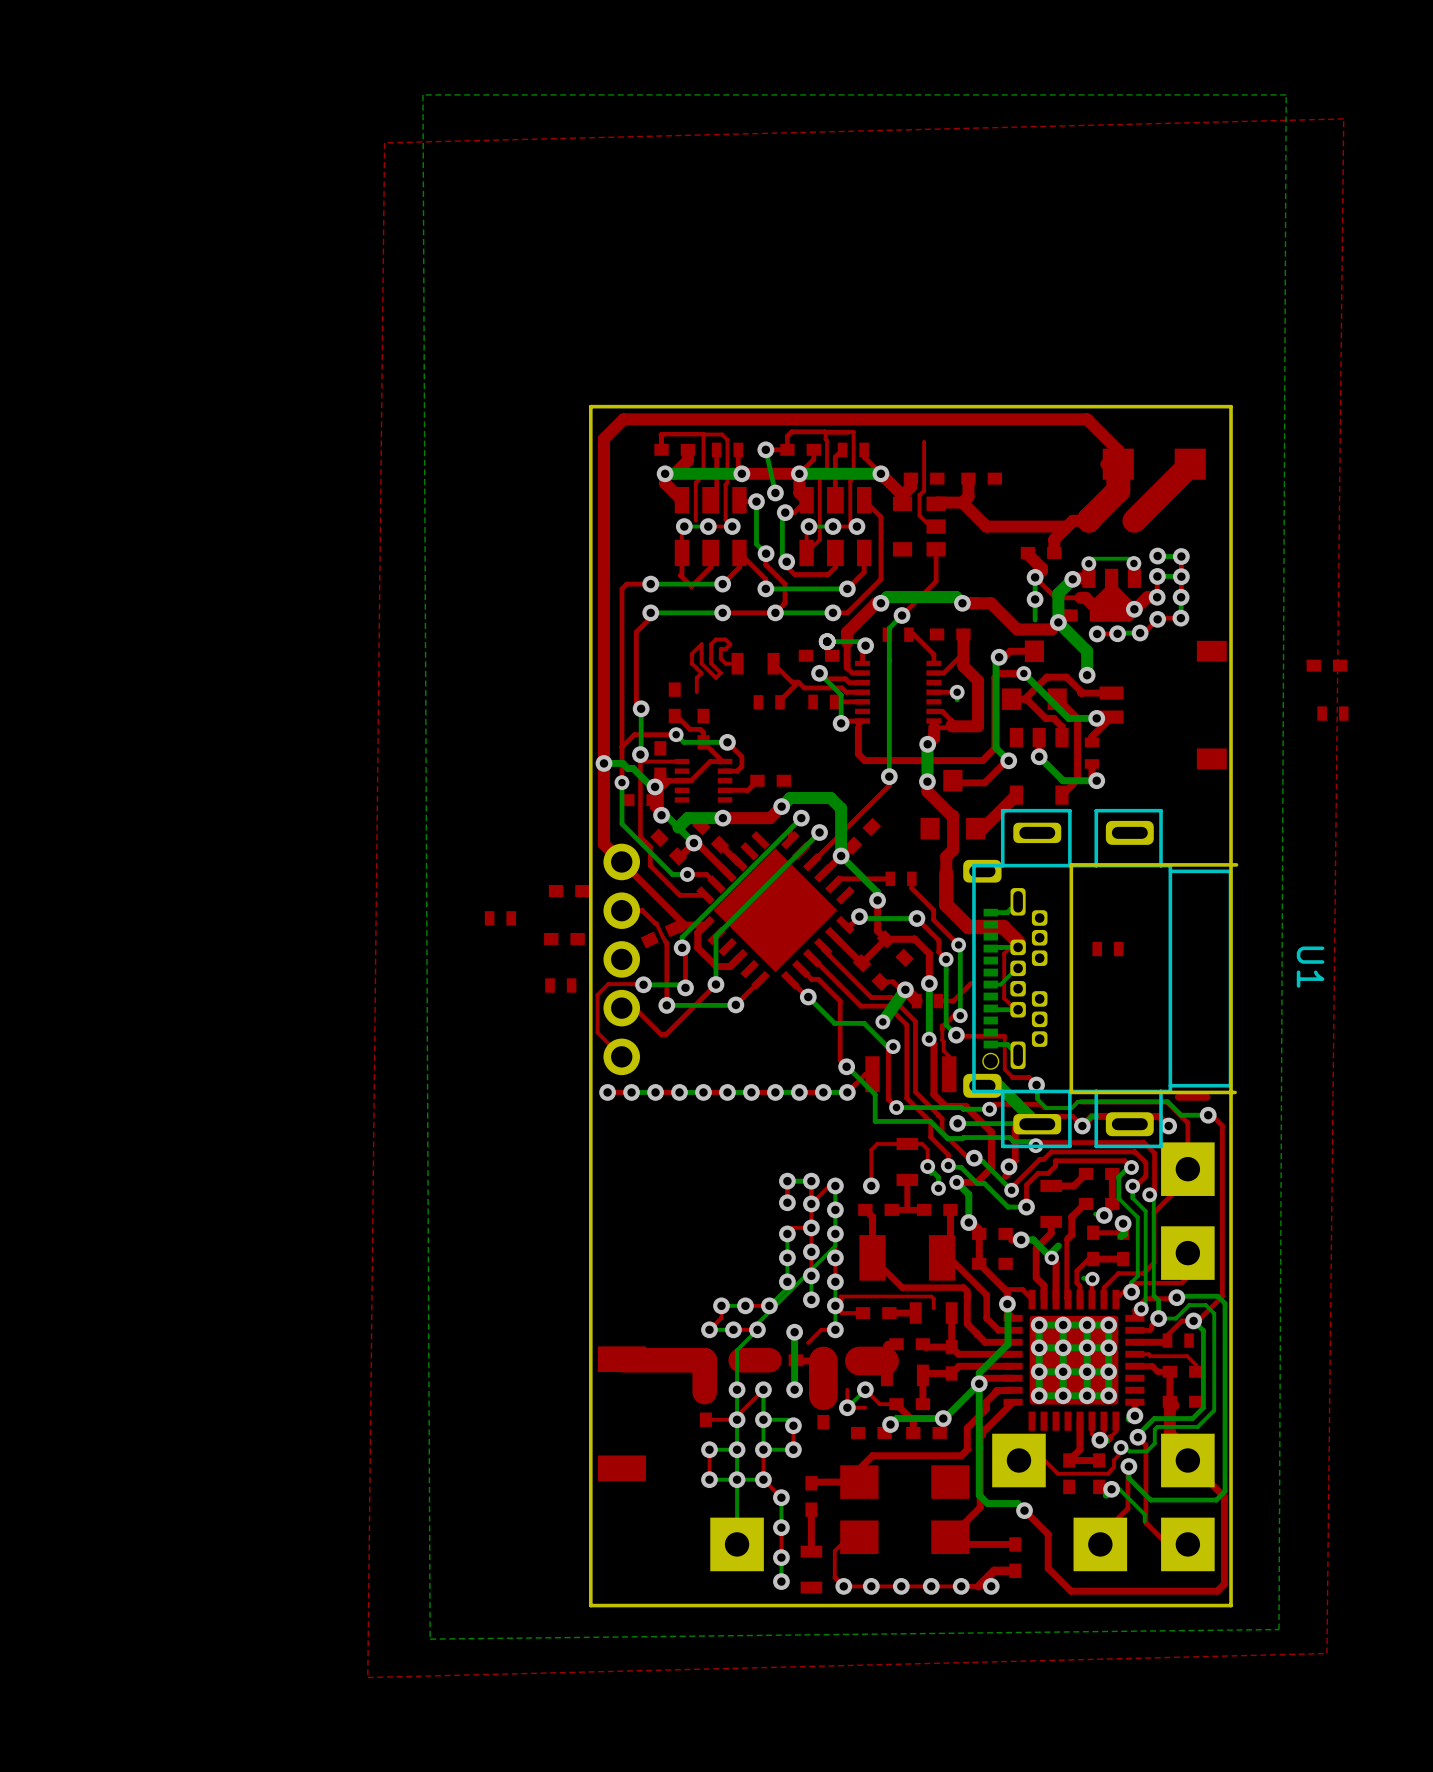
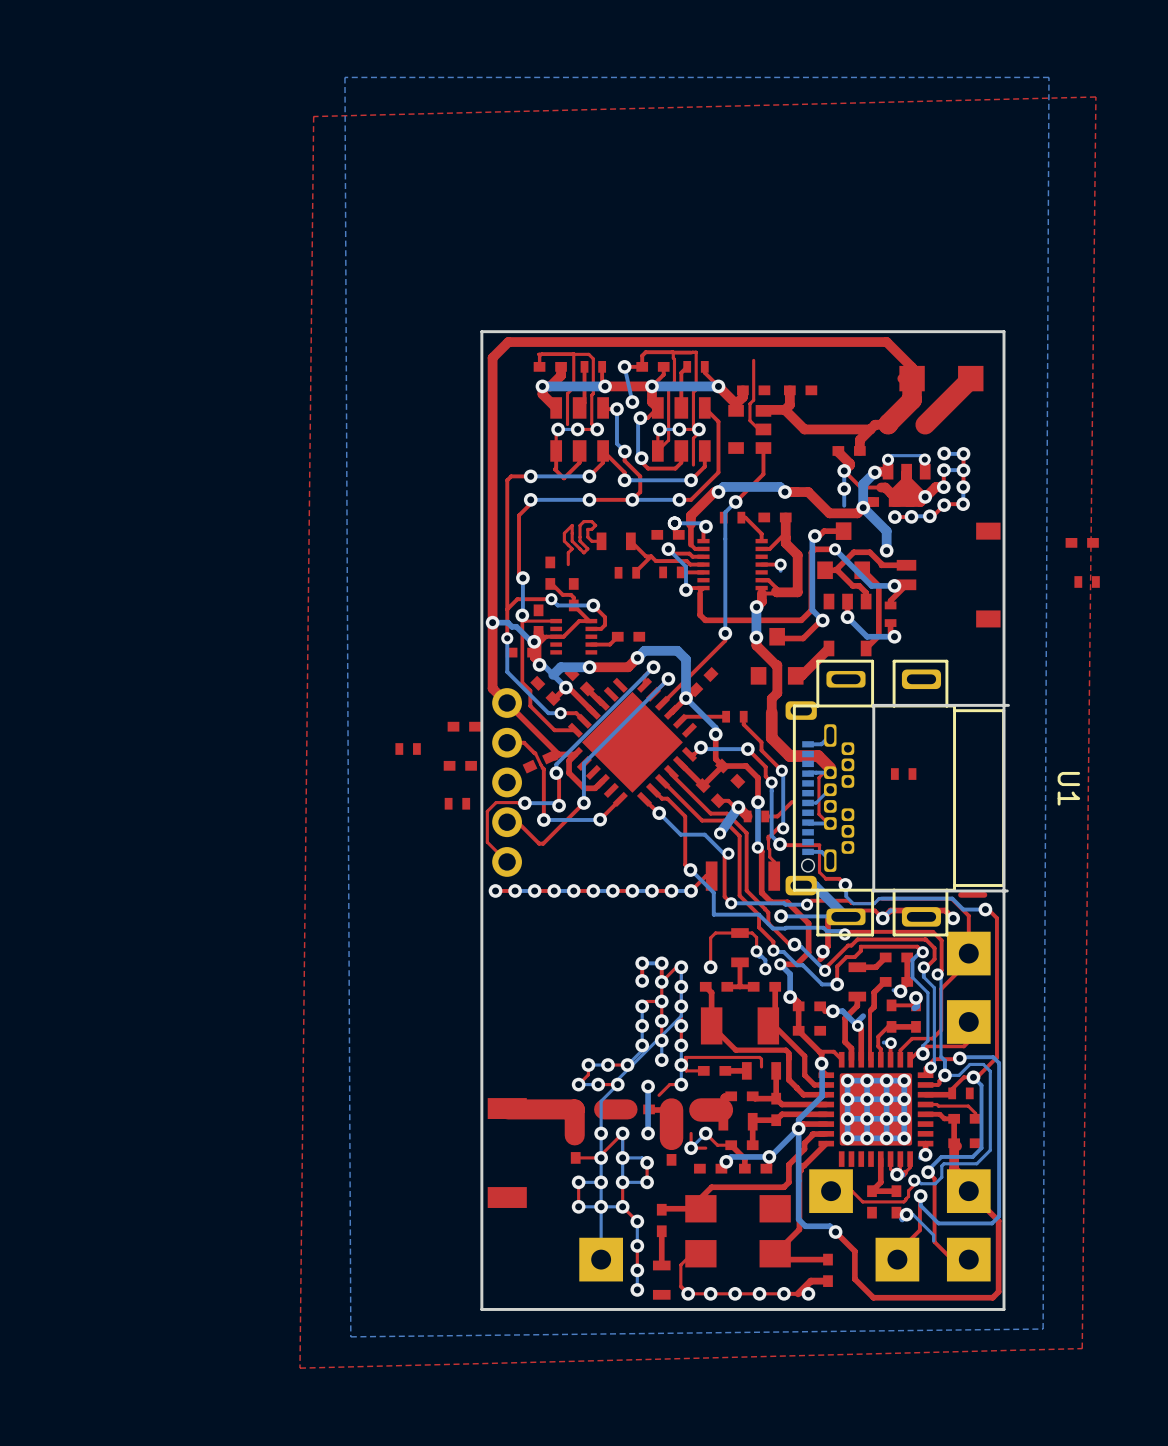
top track: none -> (698, 429) (698, 432) (693, 438) (693, 465)

